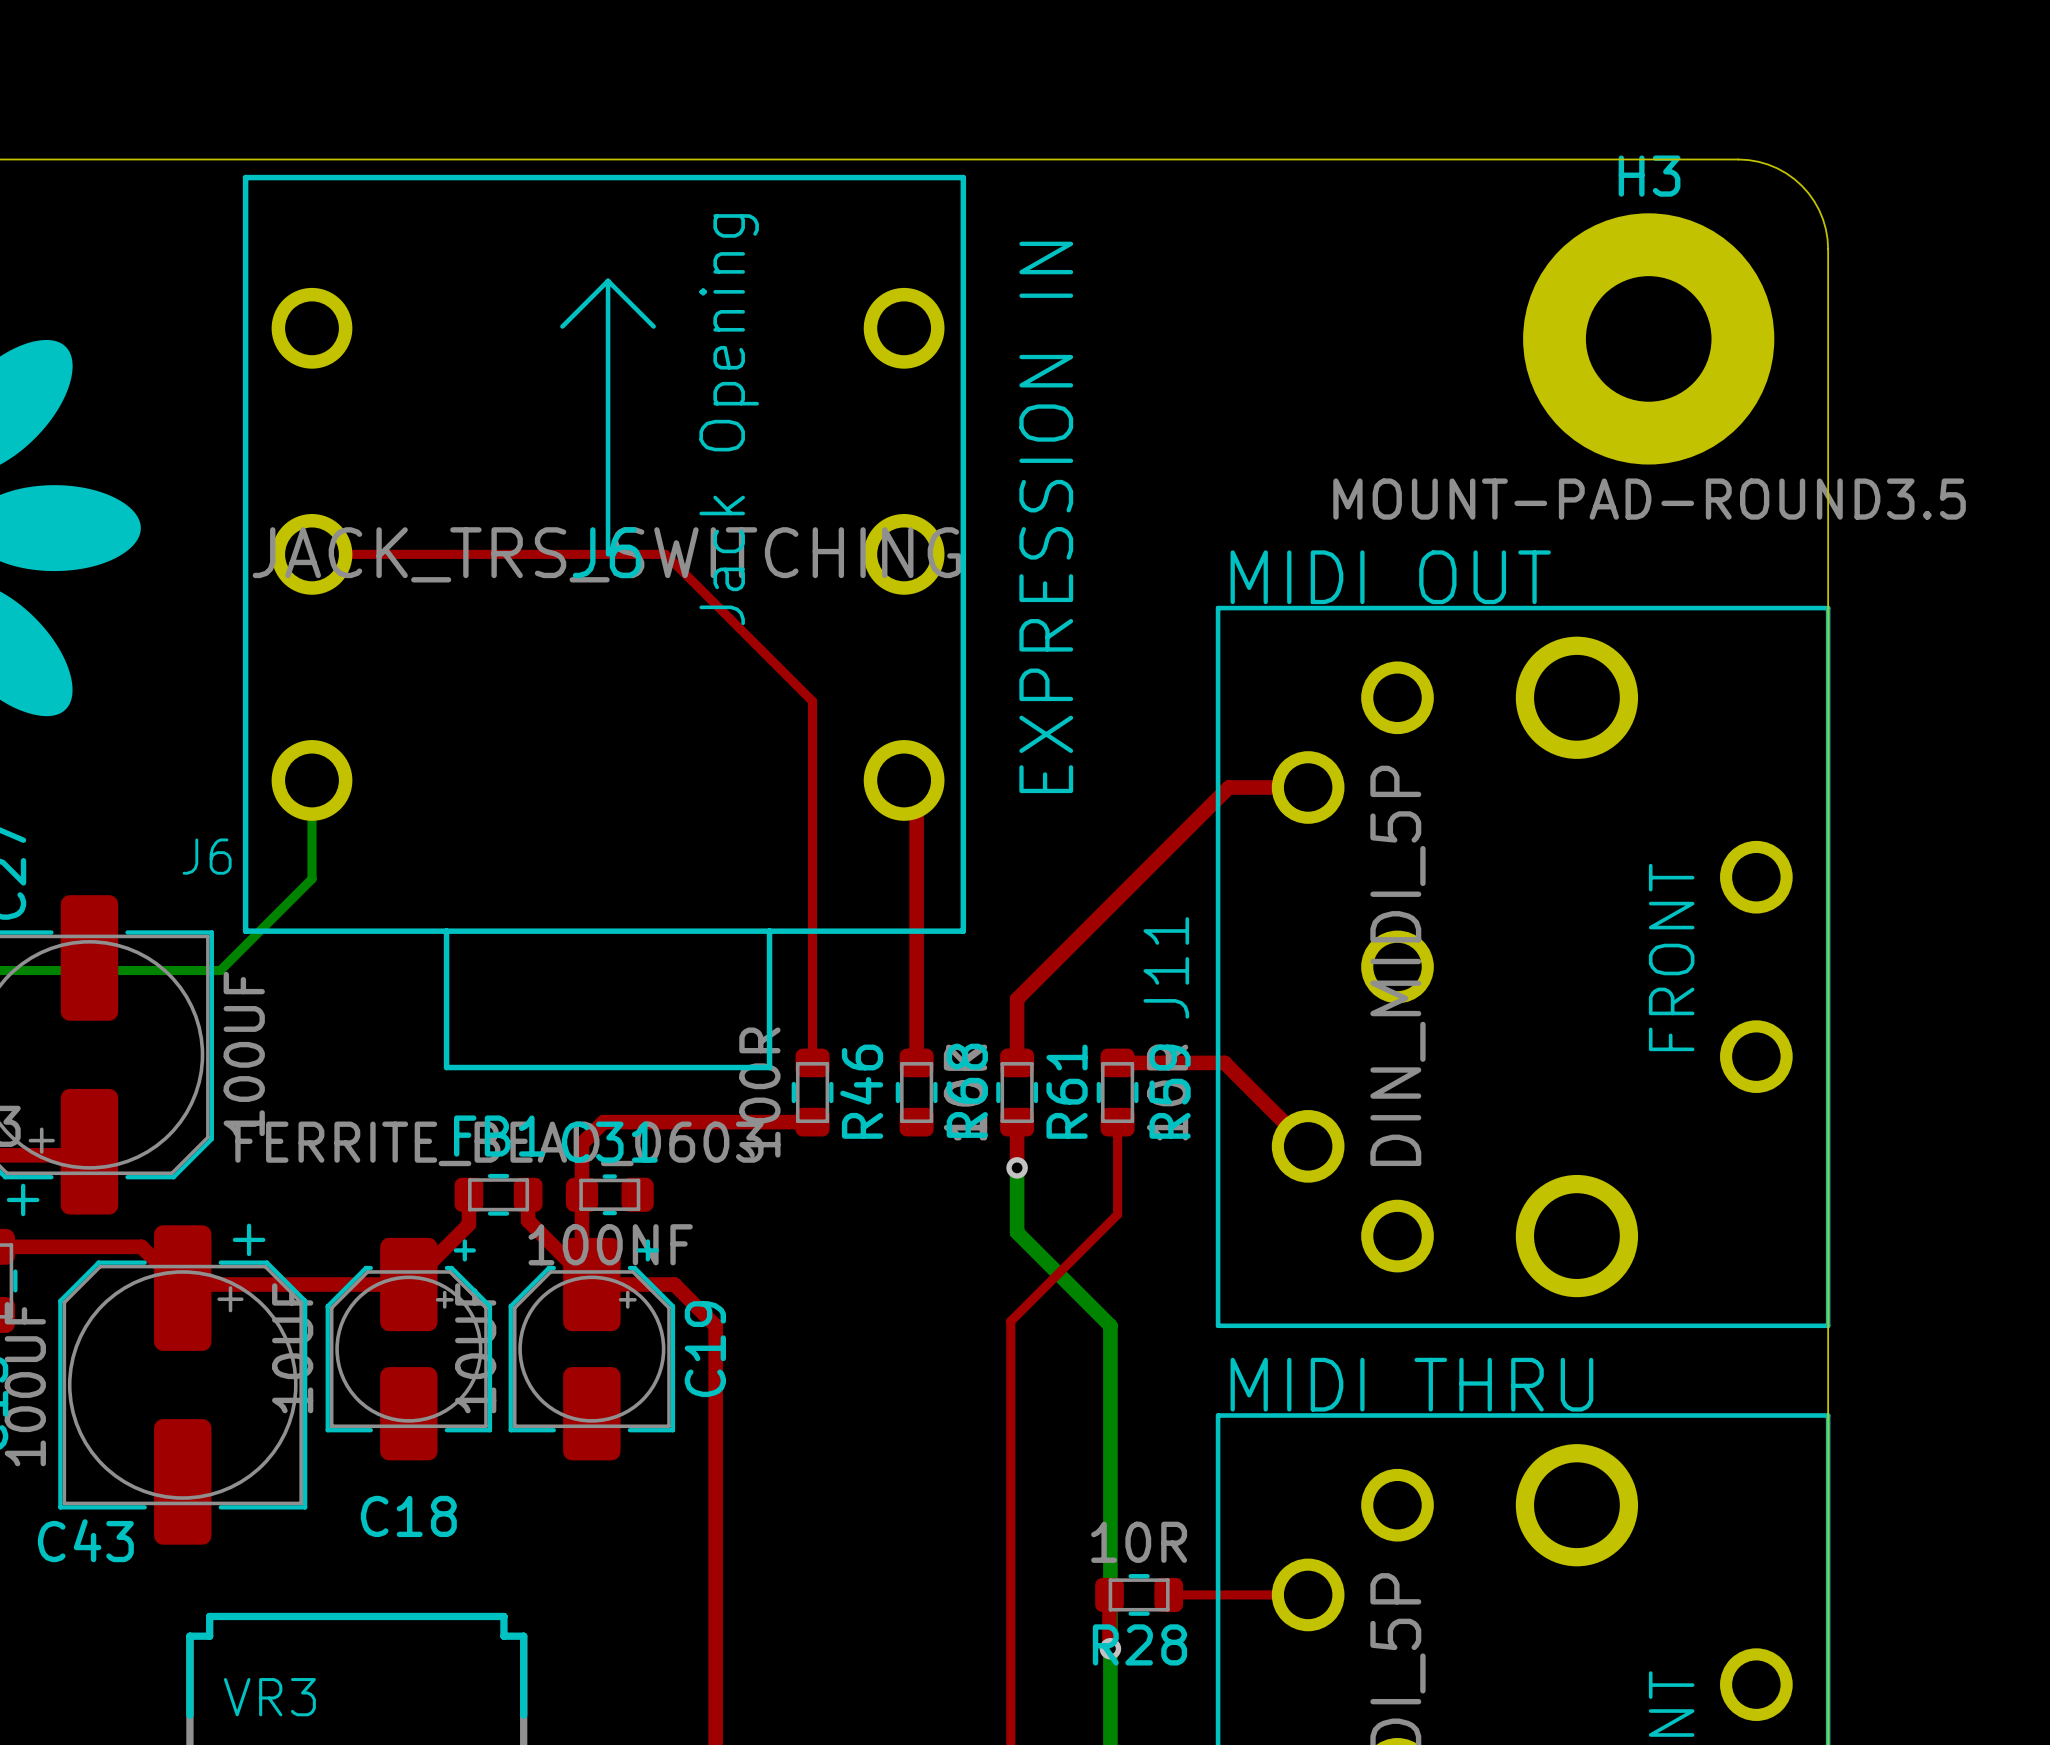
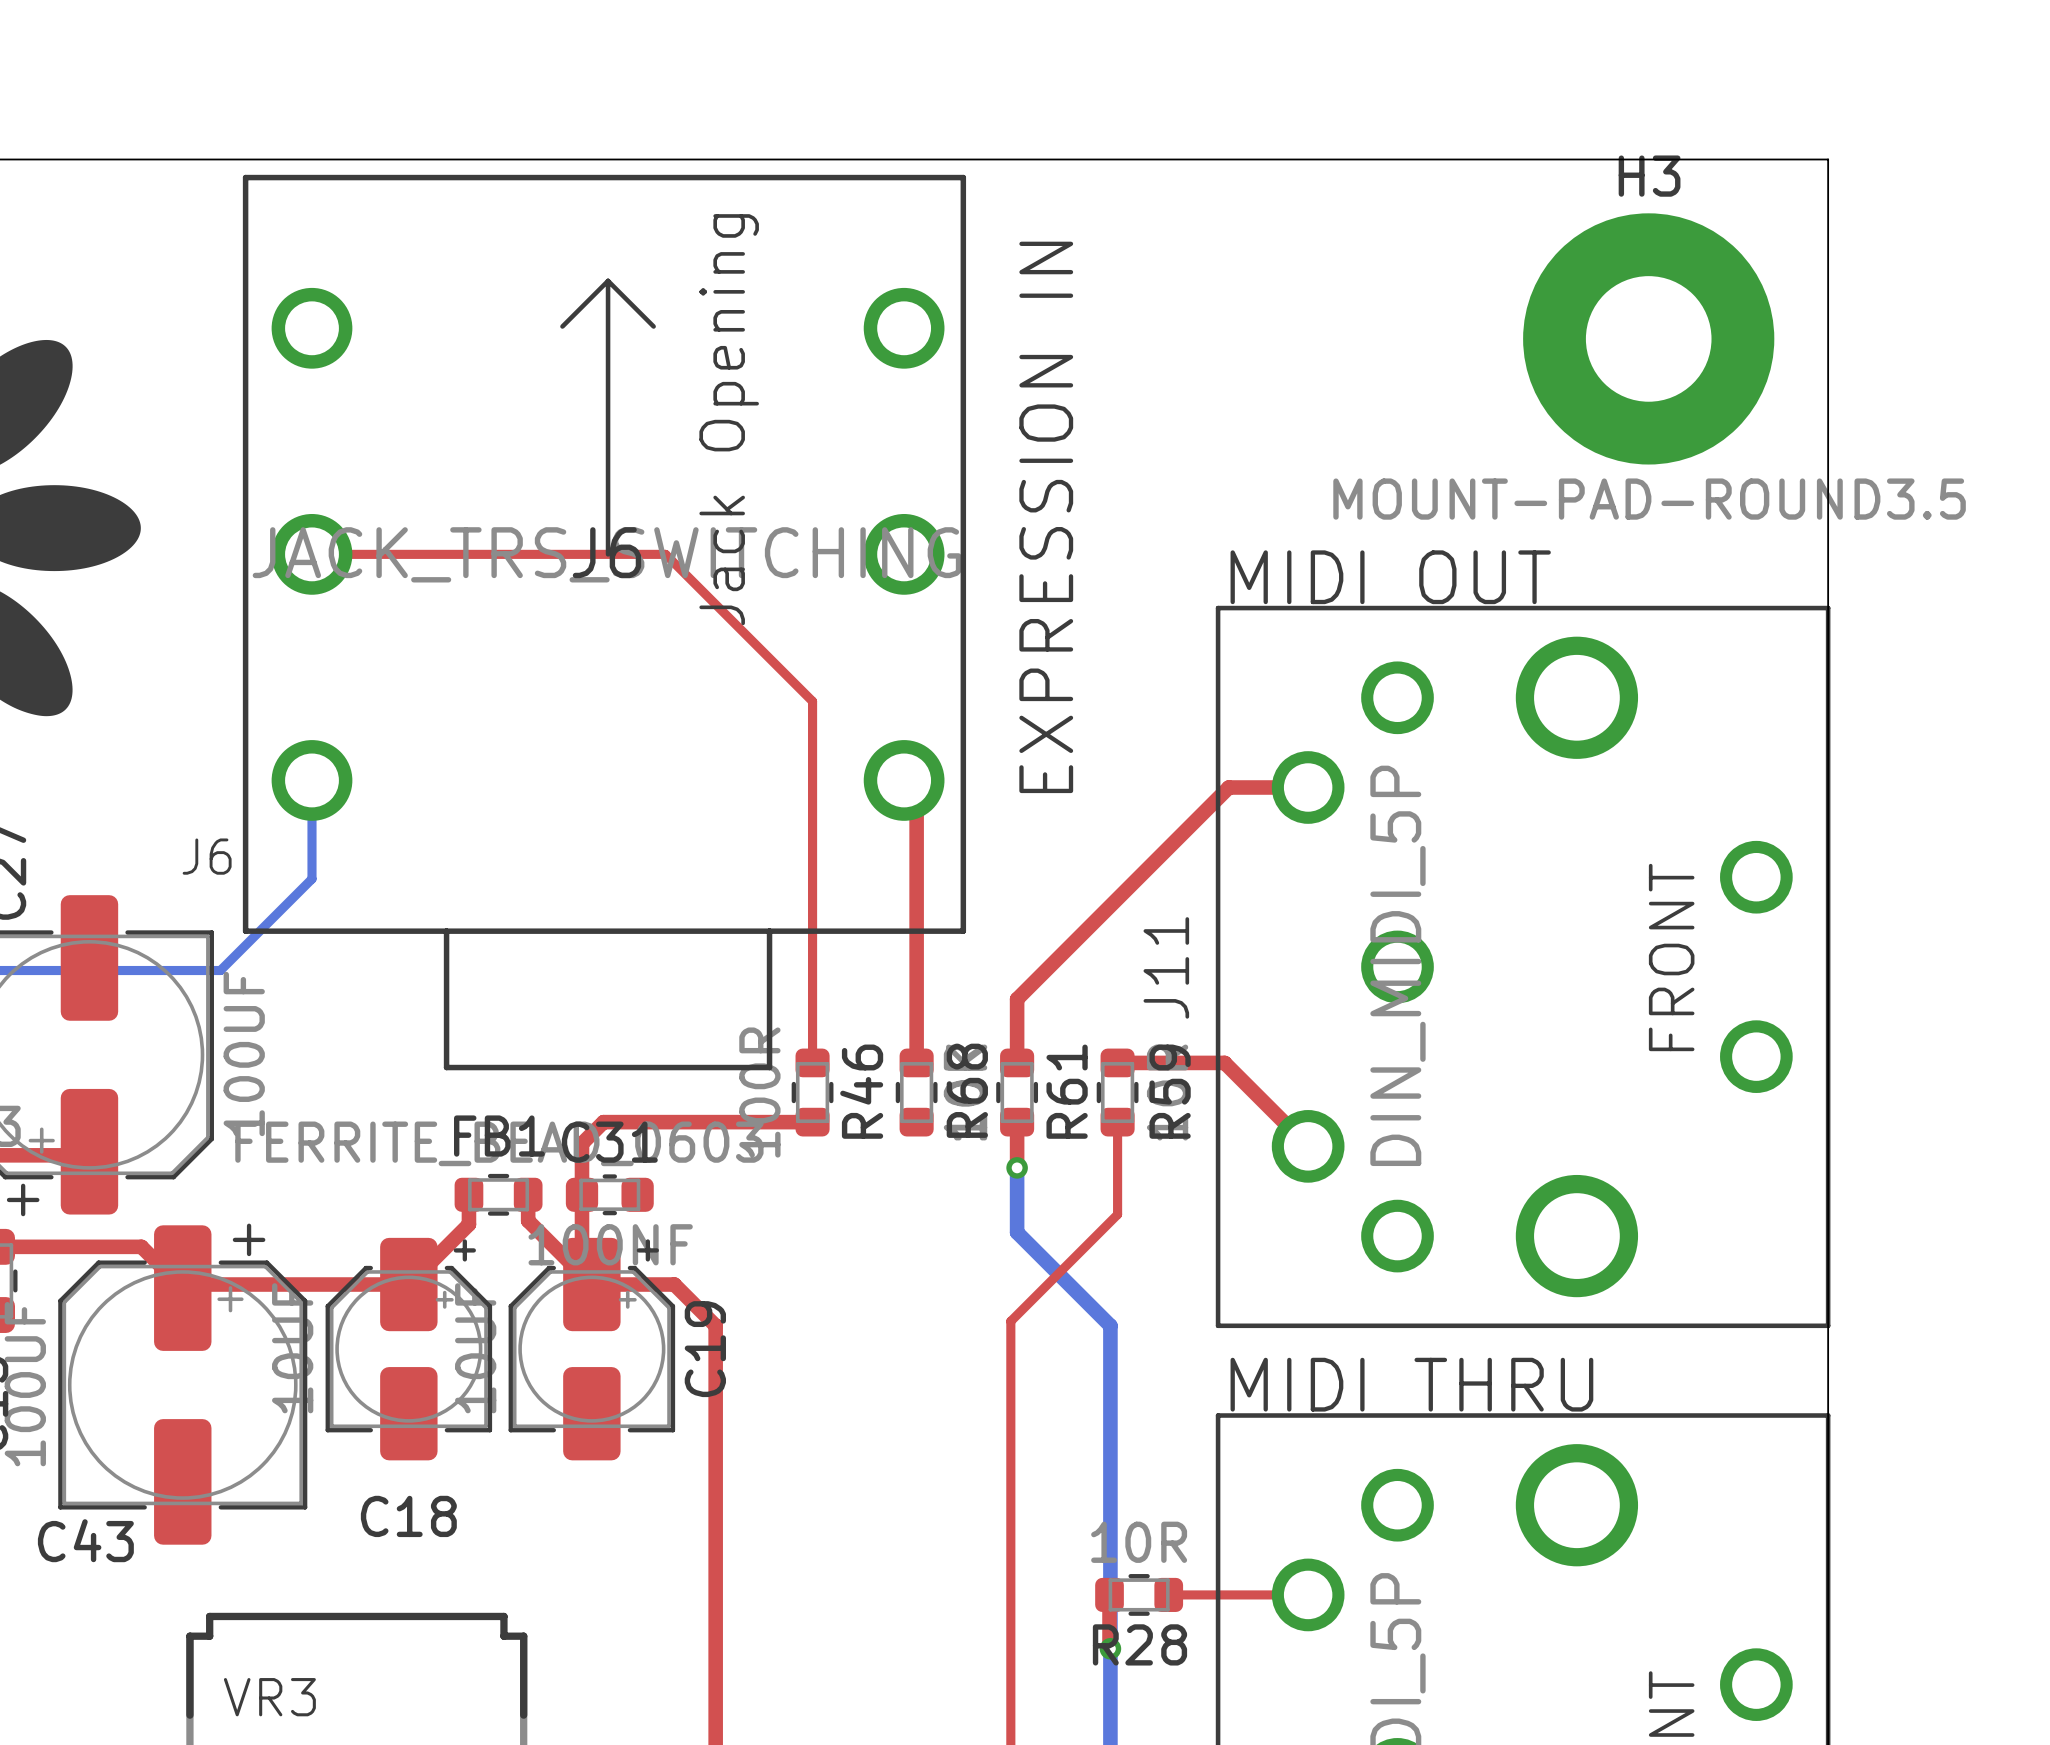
board edge: (1738, 159) (1758, 161) (1777, 168) (1801, 185) (1819, 210) (1825, 229) (1828, 249) -> (1738, 159) (1828, 159) (1828, 249)

